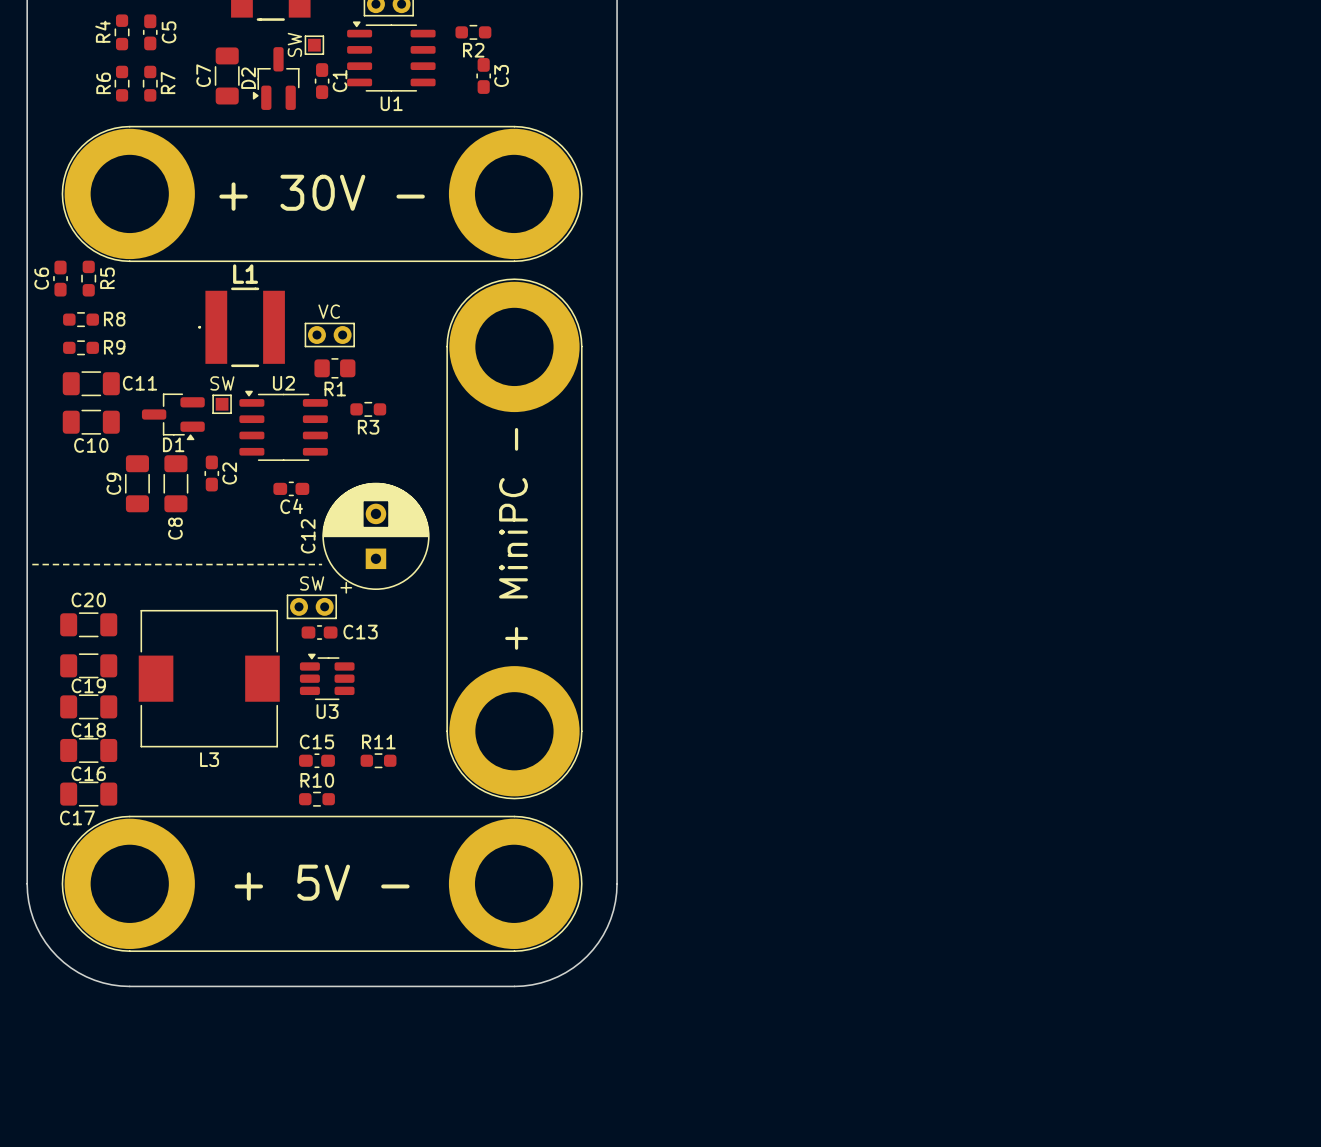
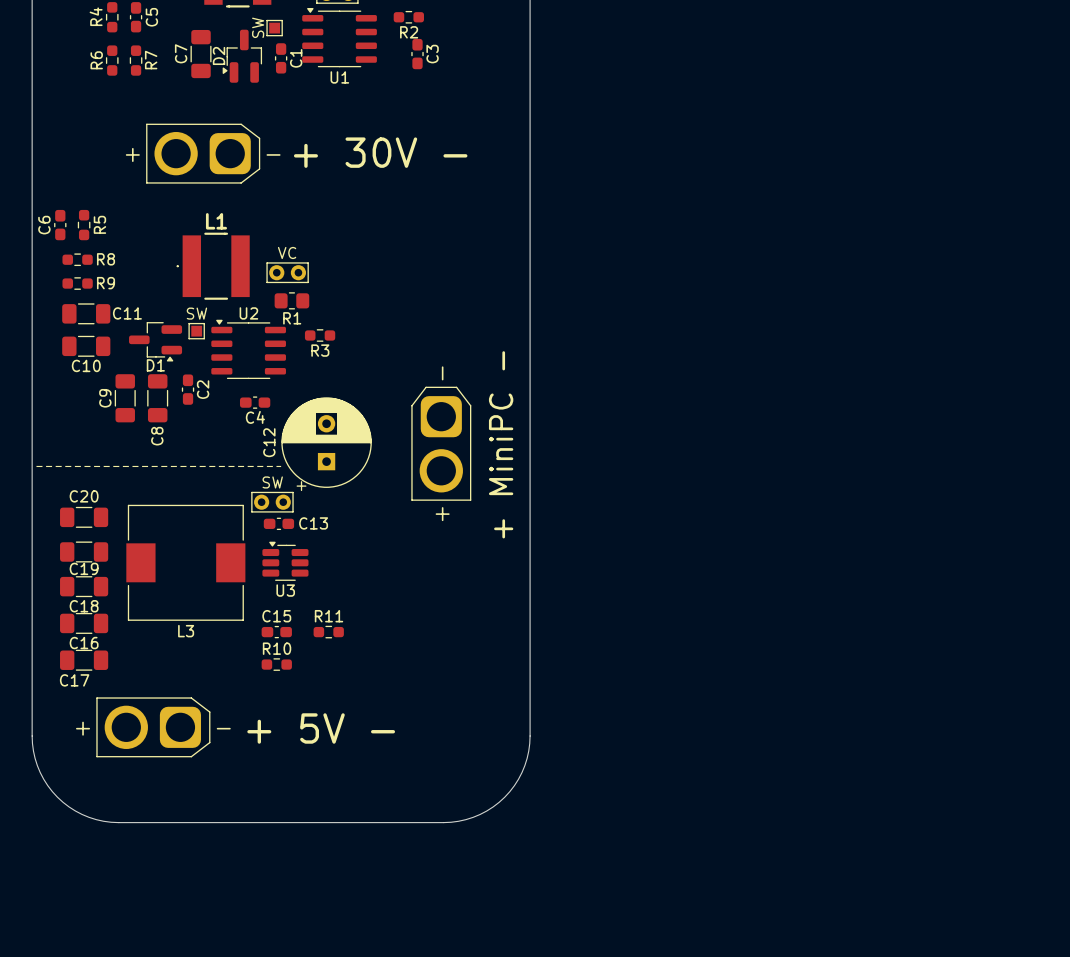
text position: + 30V - (322, 192) -> + 30V - (380, 152)
part: none -> (203, 153)
part: (322, 193) -> none
part footprint: [446, 278, 583, 800] -> [411, 386, 472, 501]
text position: + MiniPC - (513, 538) -> + MiniPC - (501, 444)
part: none -> (153, 727)
text position: + 5V - (322, 882) -> + 5V - (321, 728)
part: (322, 883) -> none

